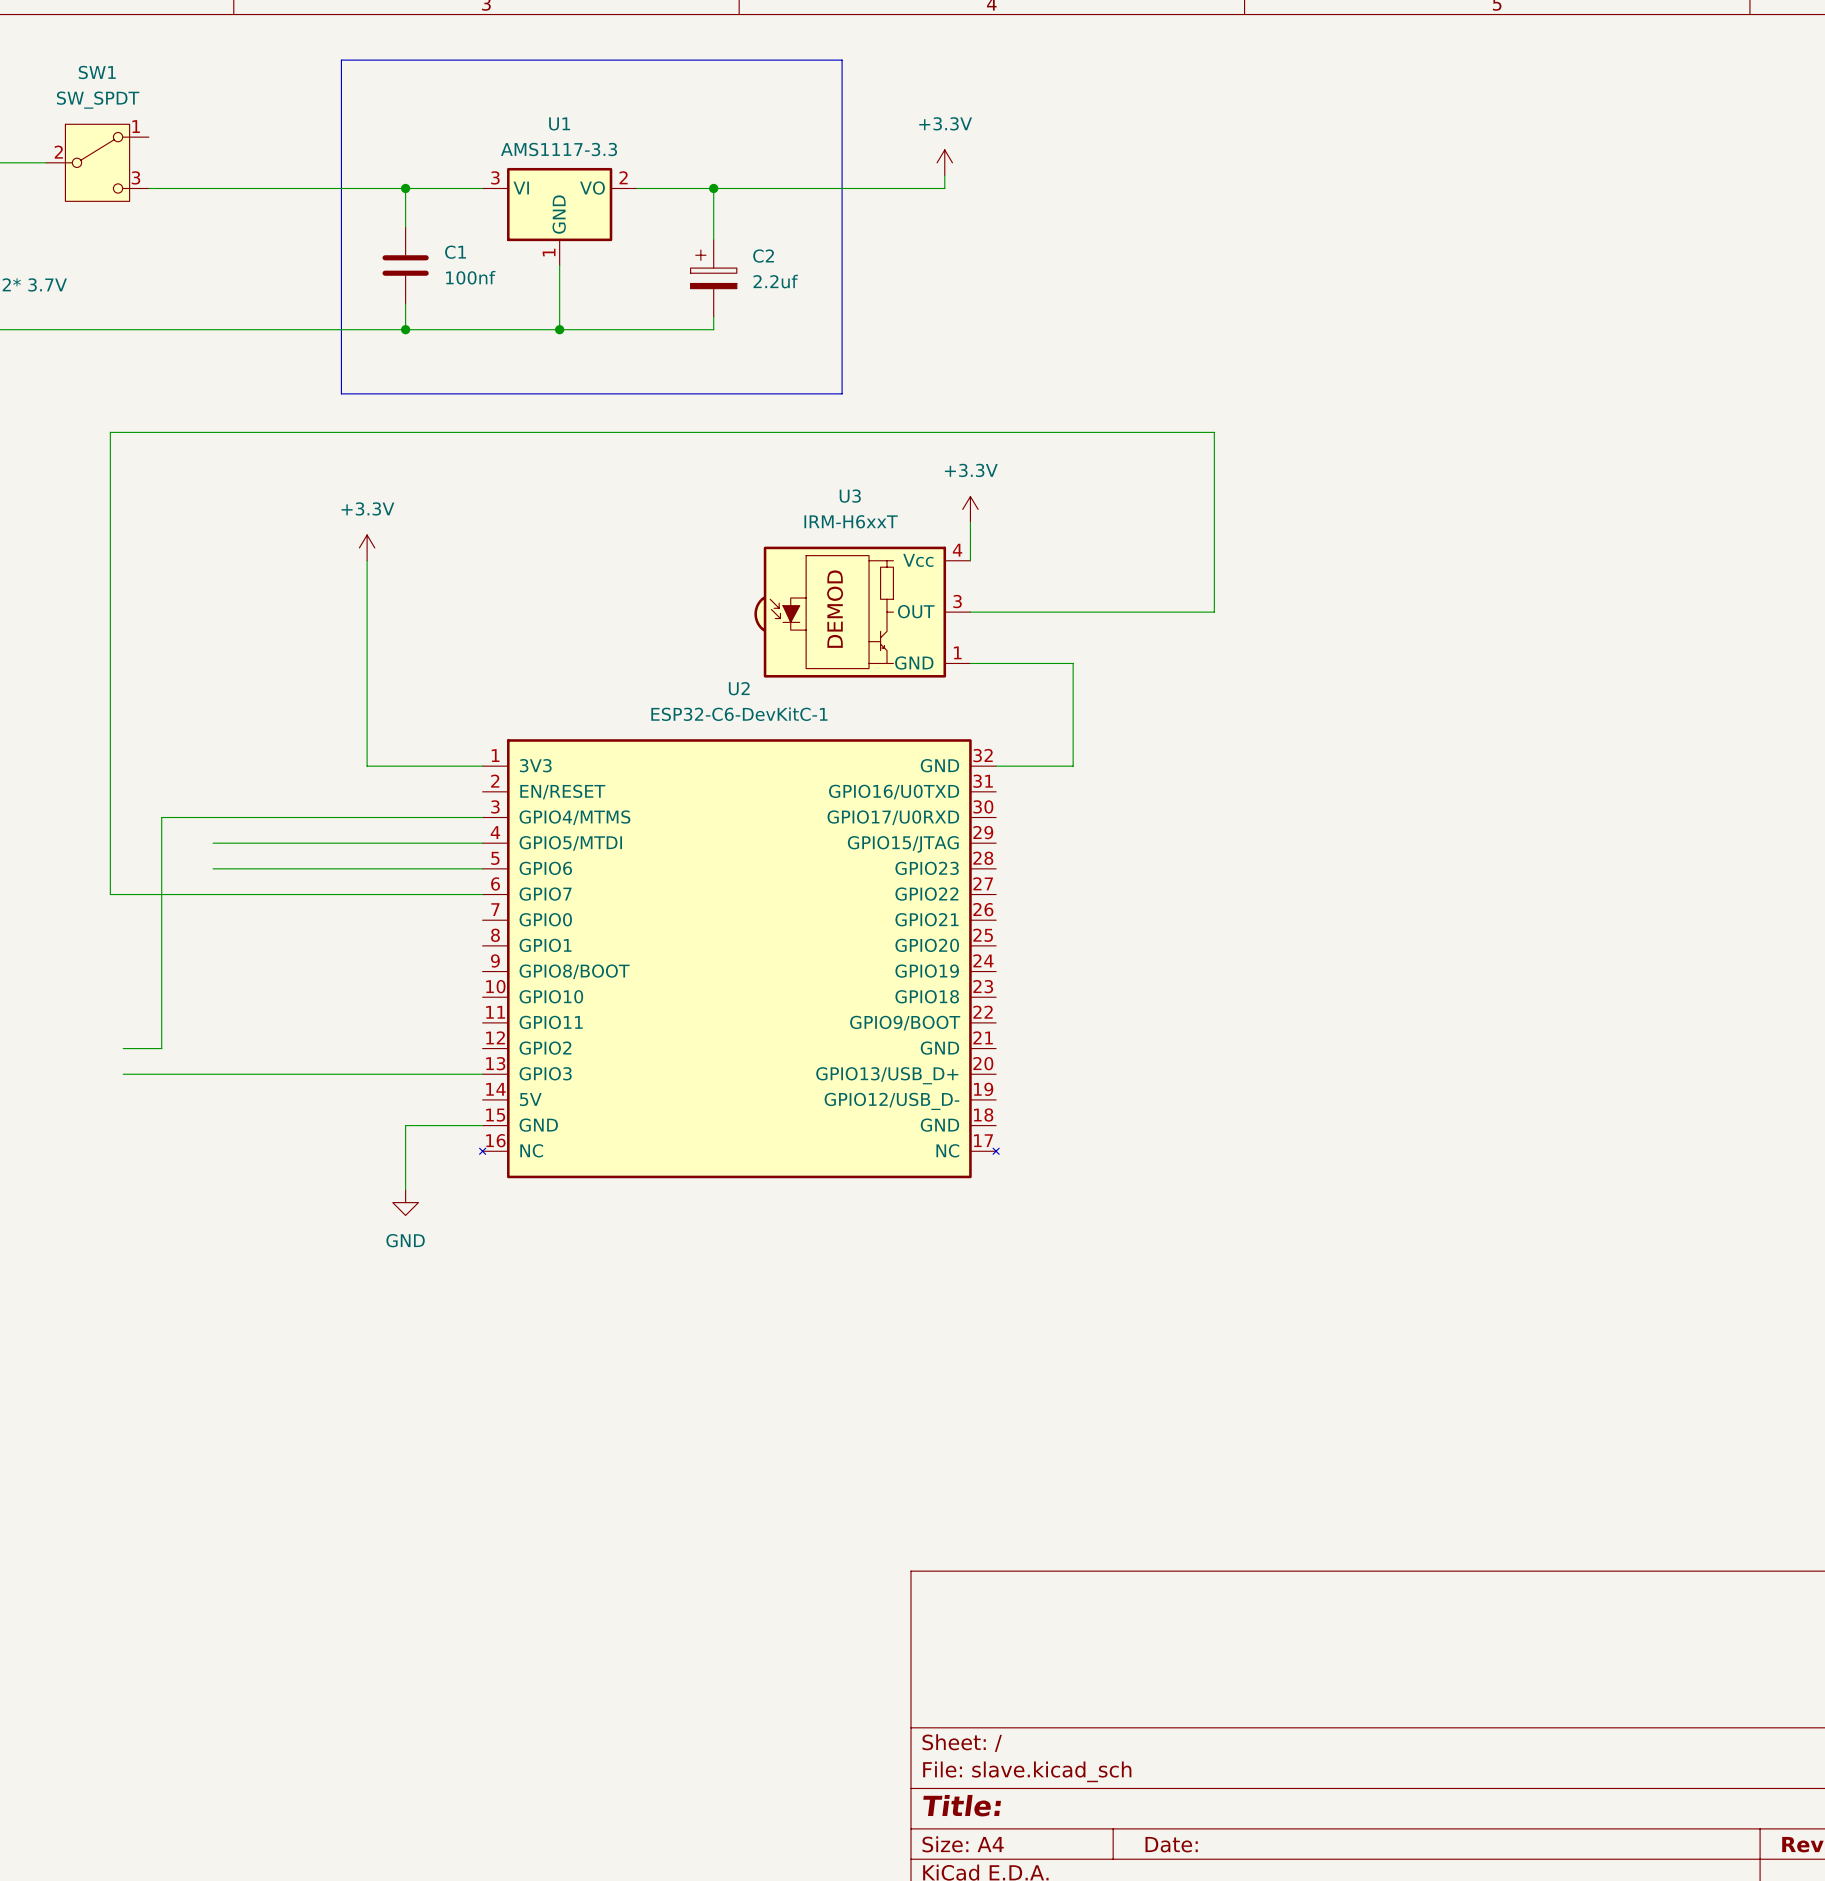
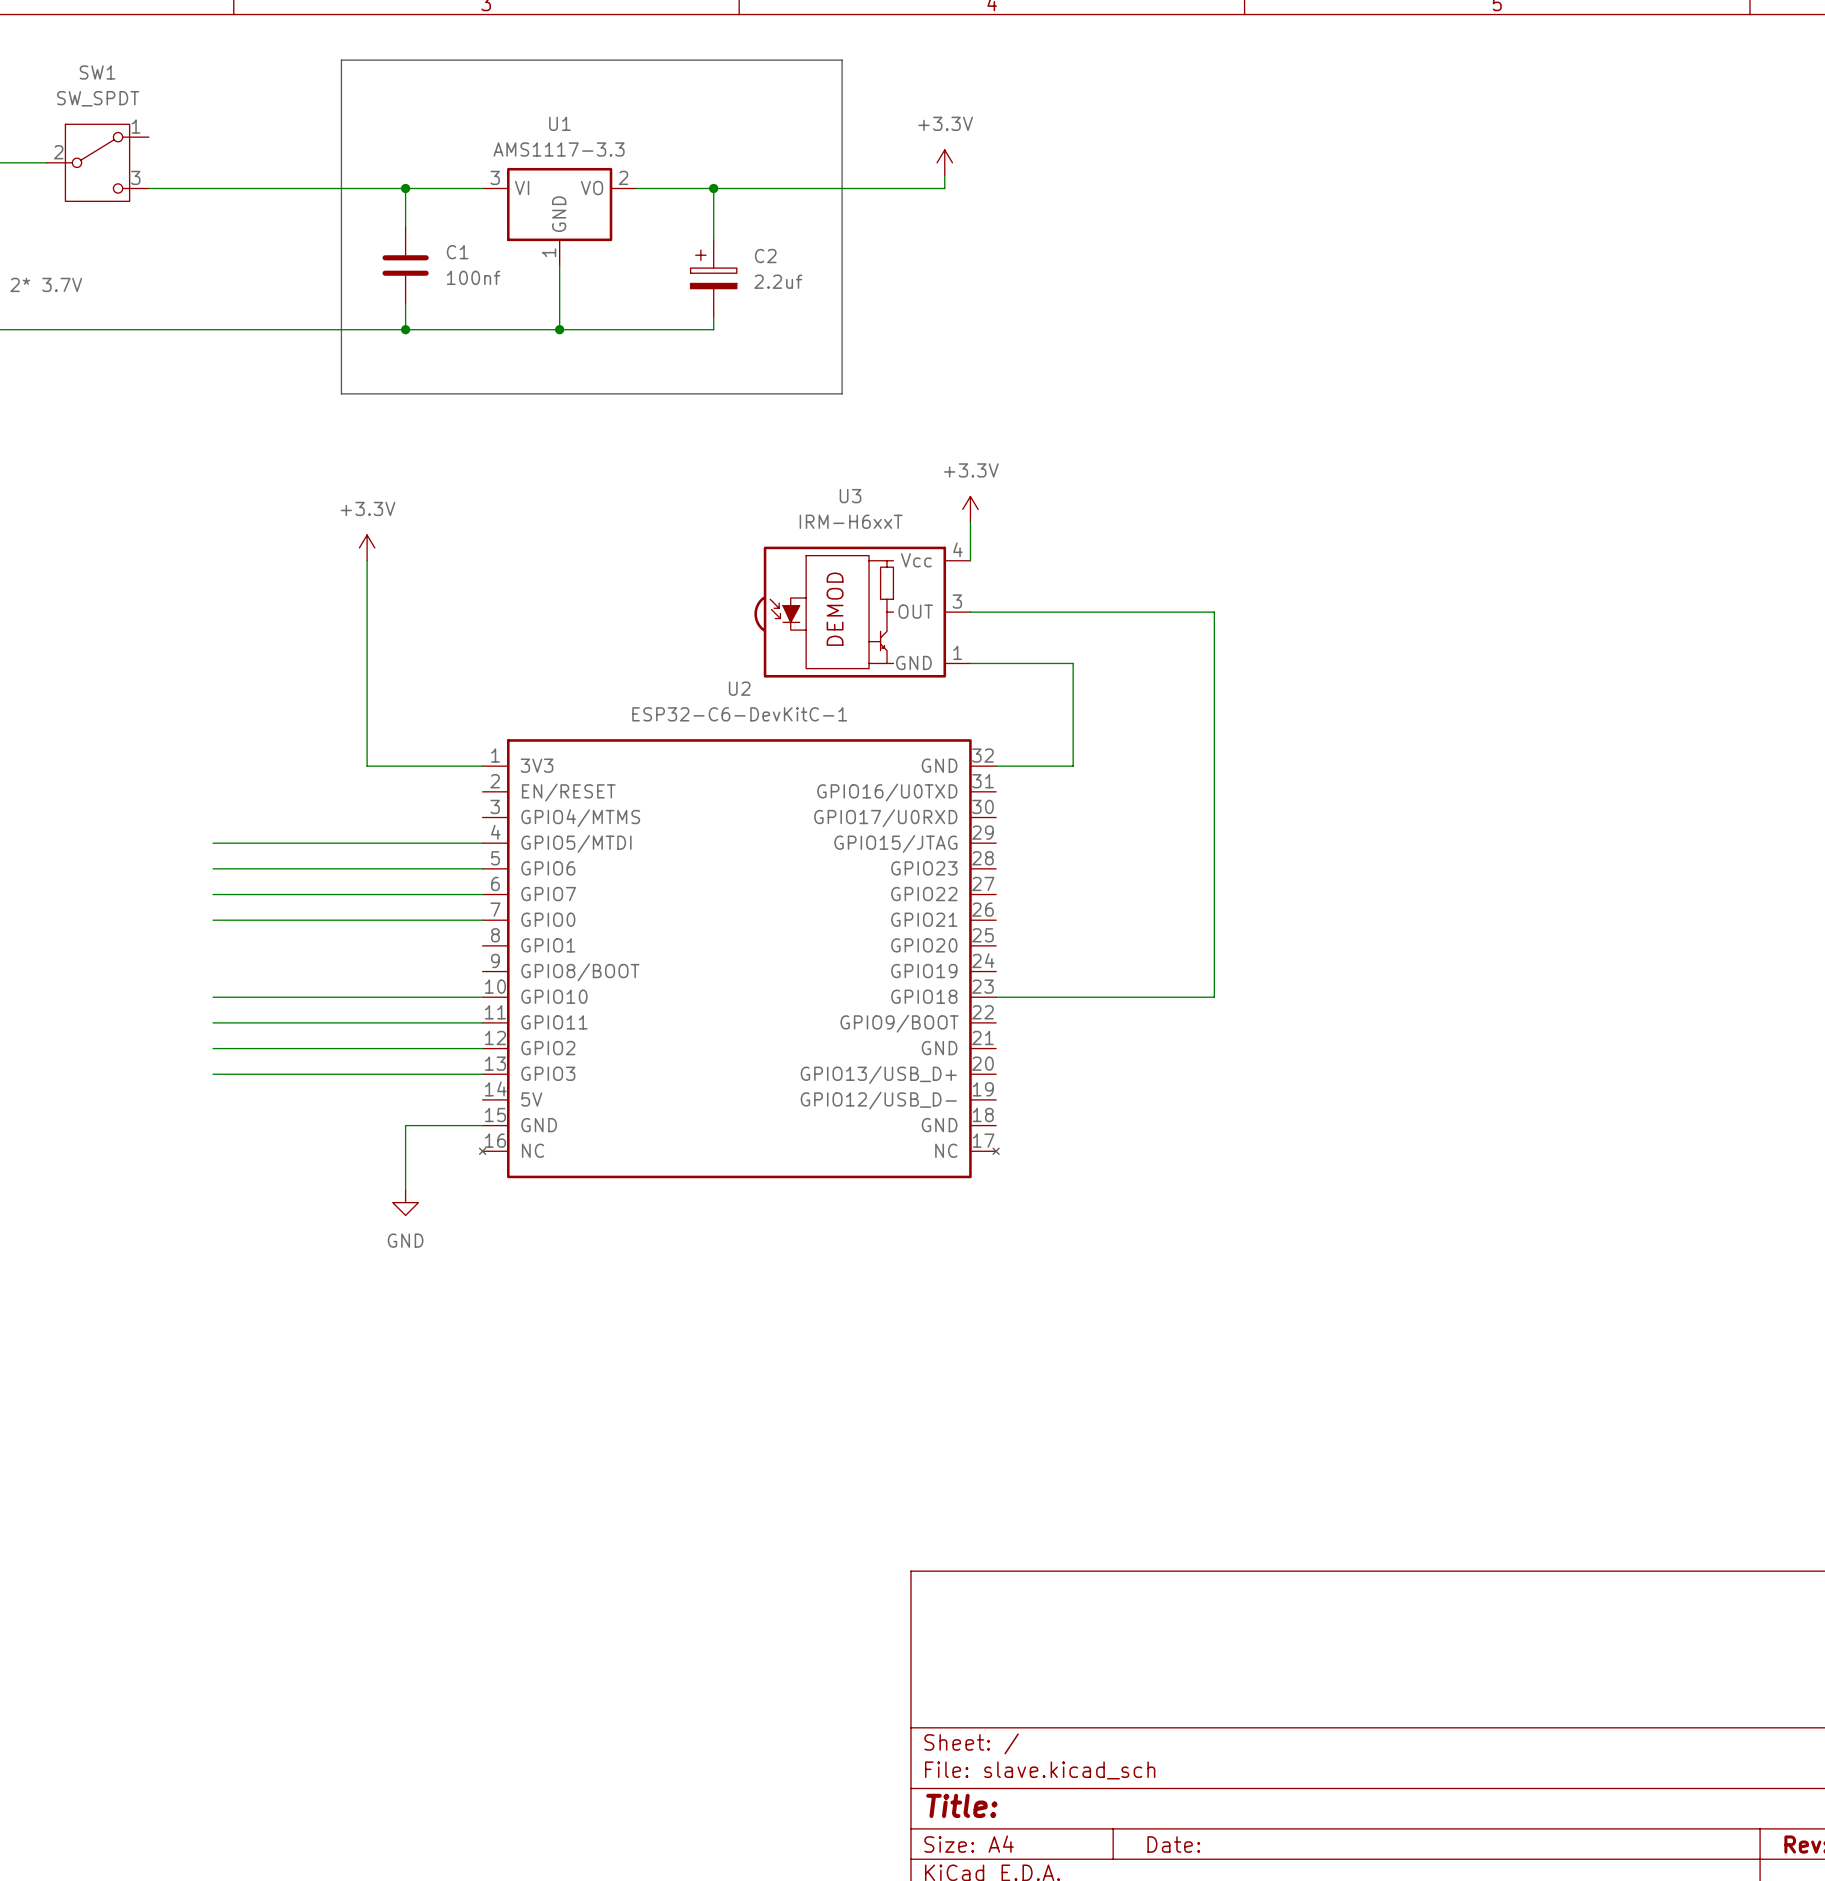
wire: (1214, 612) (1214, 432) (110, 432) (110, 894) (213, 894) -> (1214, 612) (1214, 997) (996, 997)
wire: (482, 817) (161, 817) (161, 1048) (123, 1048) -> none
wire: none -> (213, 920) (482, 920)
wire: none -> (213, 997) (482, 997)
wire: none -> (213, 1022) (482, 1022)
wire: none -> (213, 1048) (482, 1048)
wire: (123, 1074) (213, 1074) -> none

